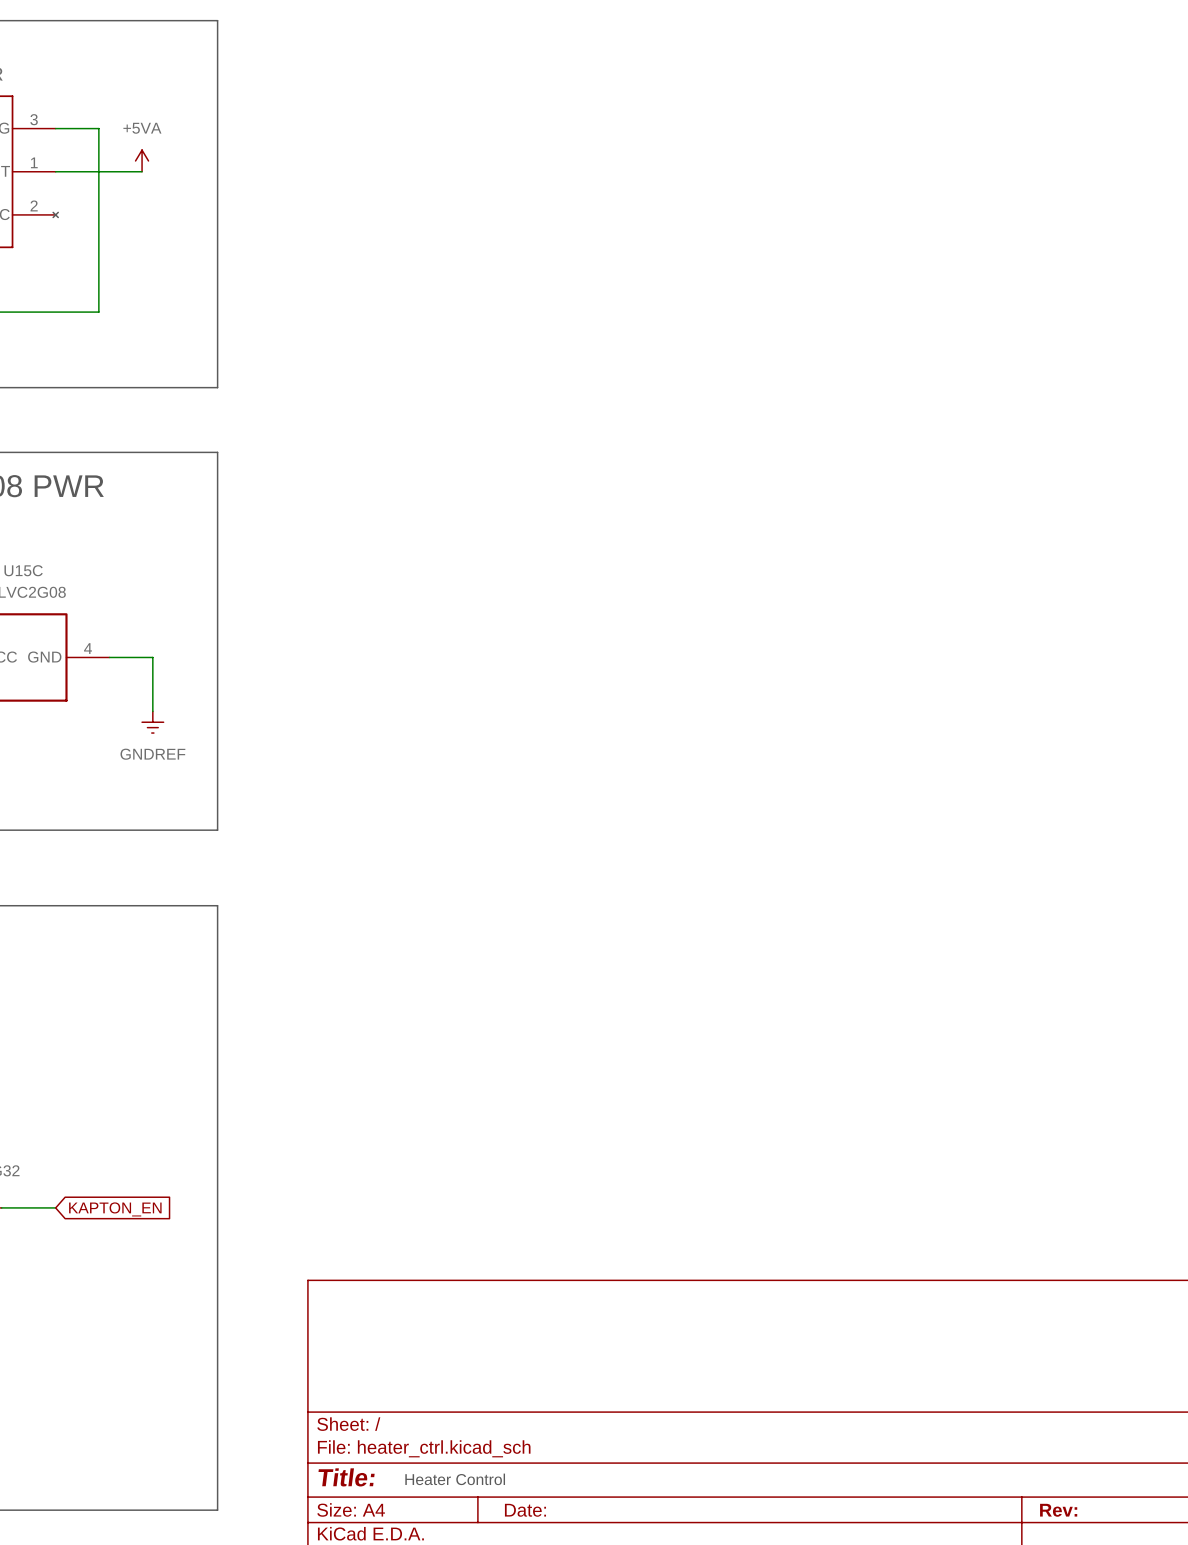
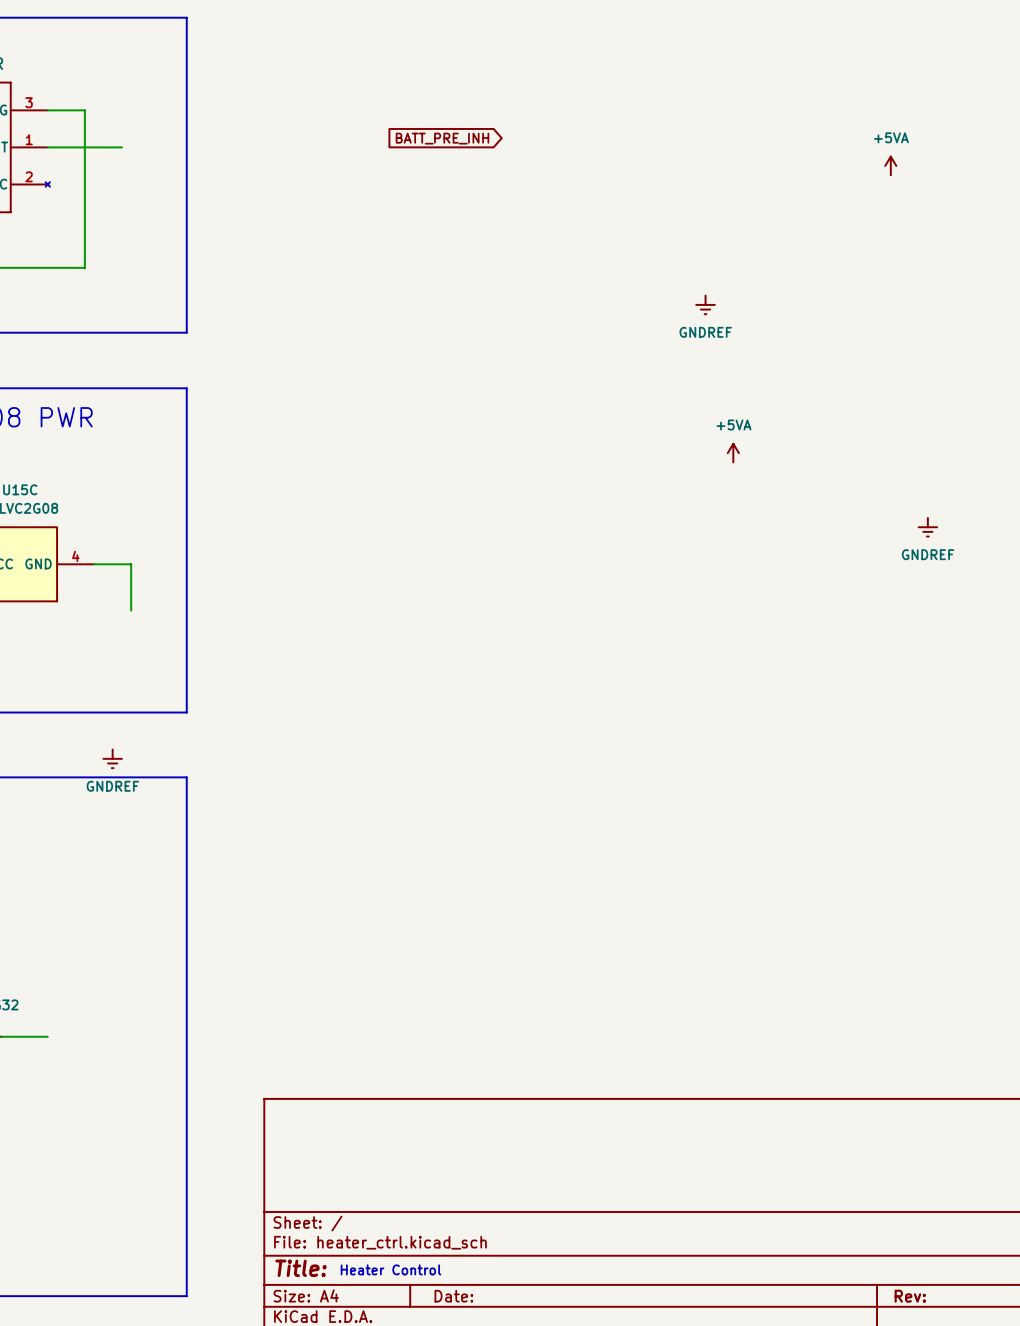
power symbol: +5VA (142, 160) -> none
global label: none -> BATT_PRE_INH (442, 138)
power symbol: none -> +5VA (890, 165)
power symbol: none -> GNDREF (705, 304)
power symbol: none -> +5VA (733, 453)
power symbol: none -> GNDREF (927, 527)
power symbol position: GNDREF (152, 722) -> GNDREF (112, 758)
global label: KAPTON_EN (115, 1209) -> none

